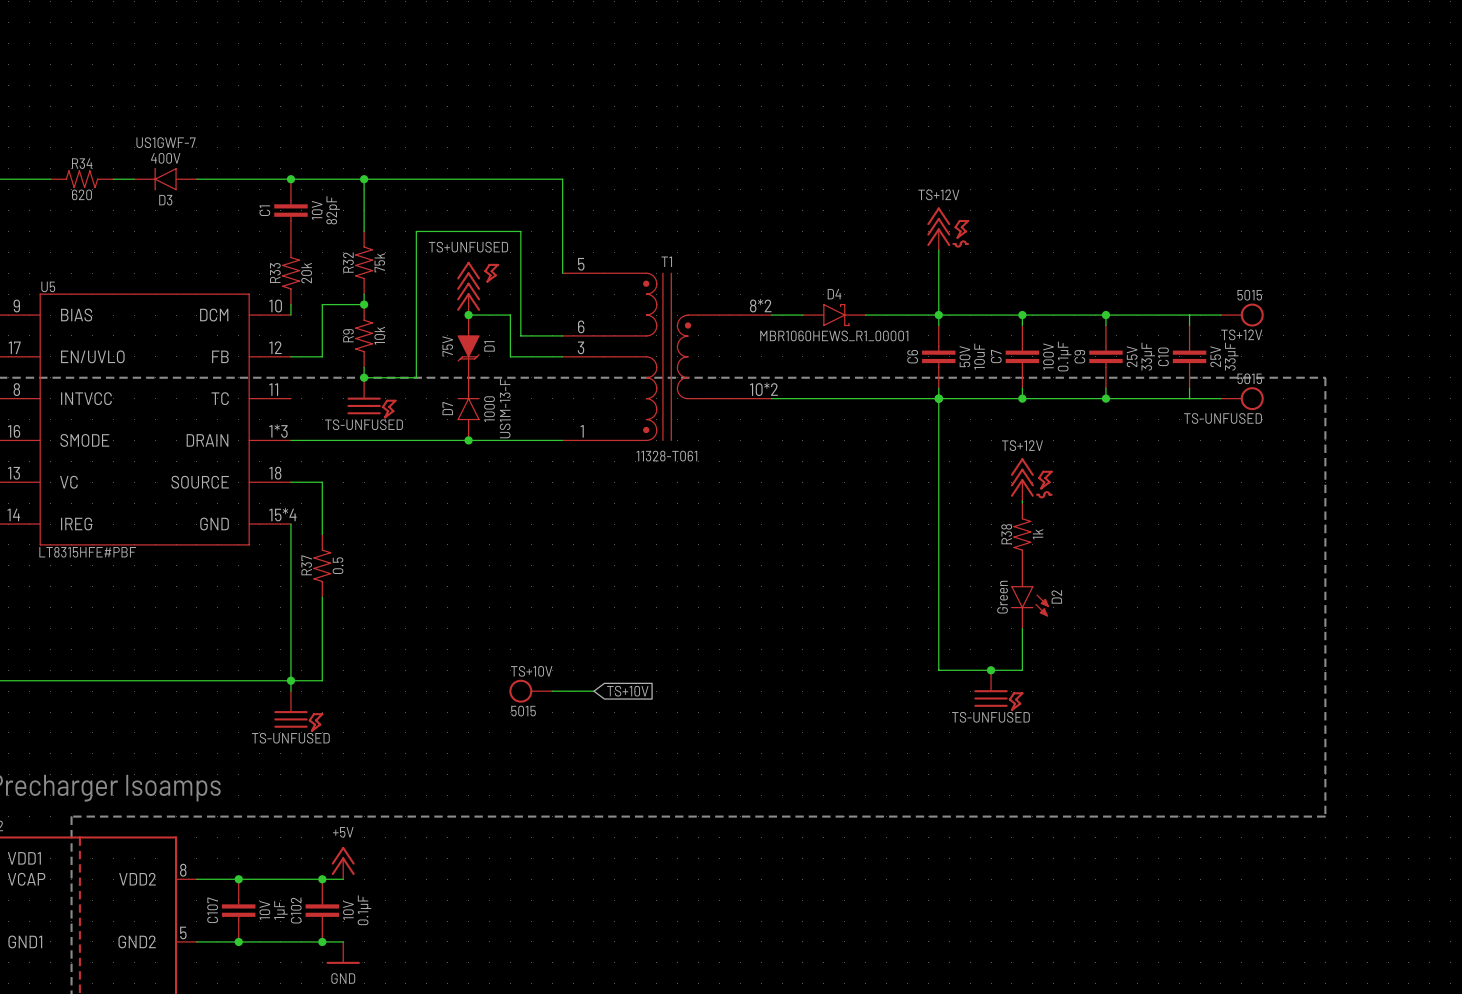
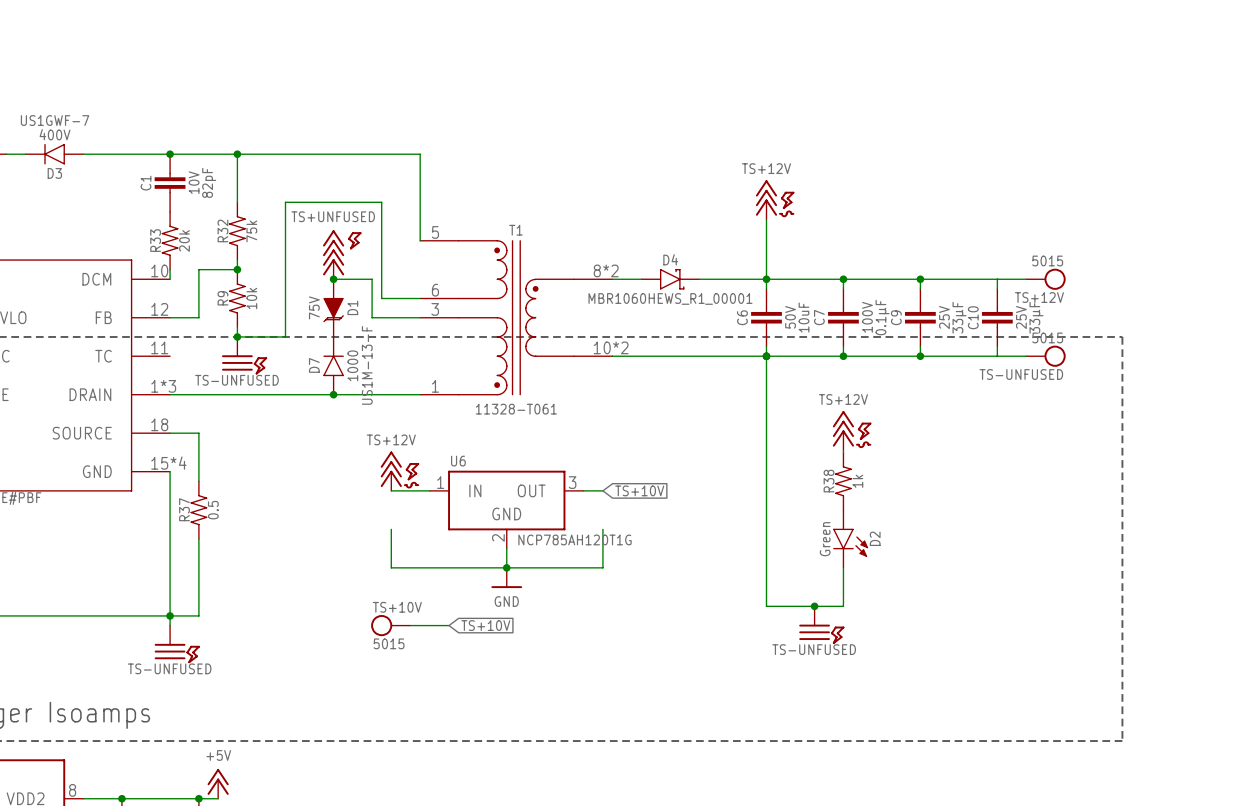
power symbol: none -> TS+12V (399, 471)
wire: none -> (391, 490) (429, 490)
wire: none -> (583, 490) (602, 490)
global label: none -> TS+10V (639, 490)
U6: none -> (506, 509)
wire: none -> (391, 529) (391, 567) (602, 567) (602, 529)
wire: none -> (506, 548) (506, 567)
junction: none -> (506, 567)
power symbol: none -> GND (506, 577)

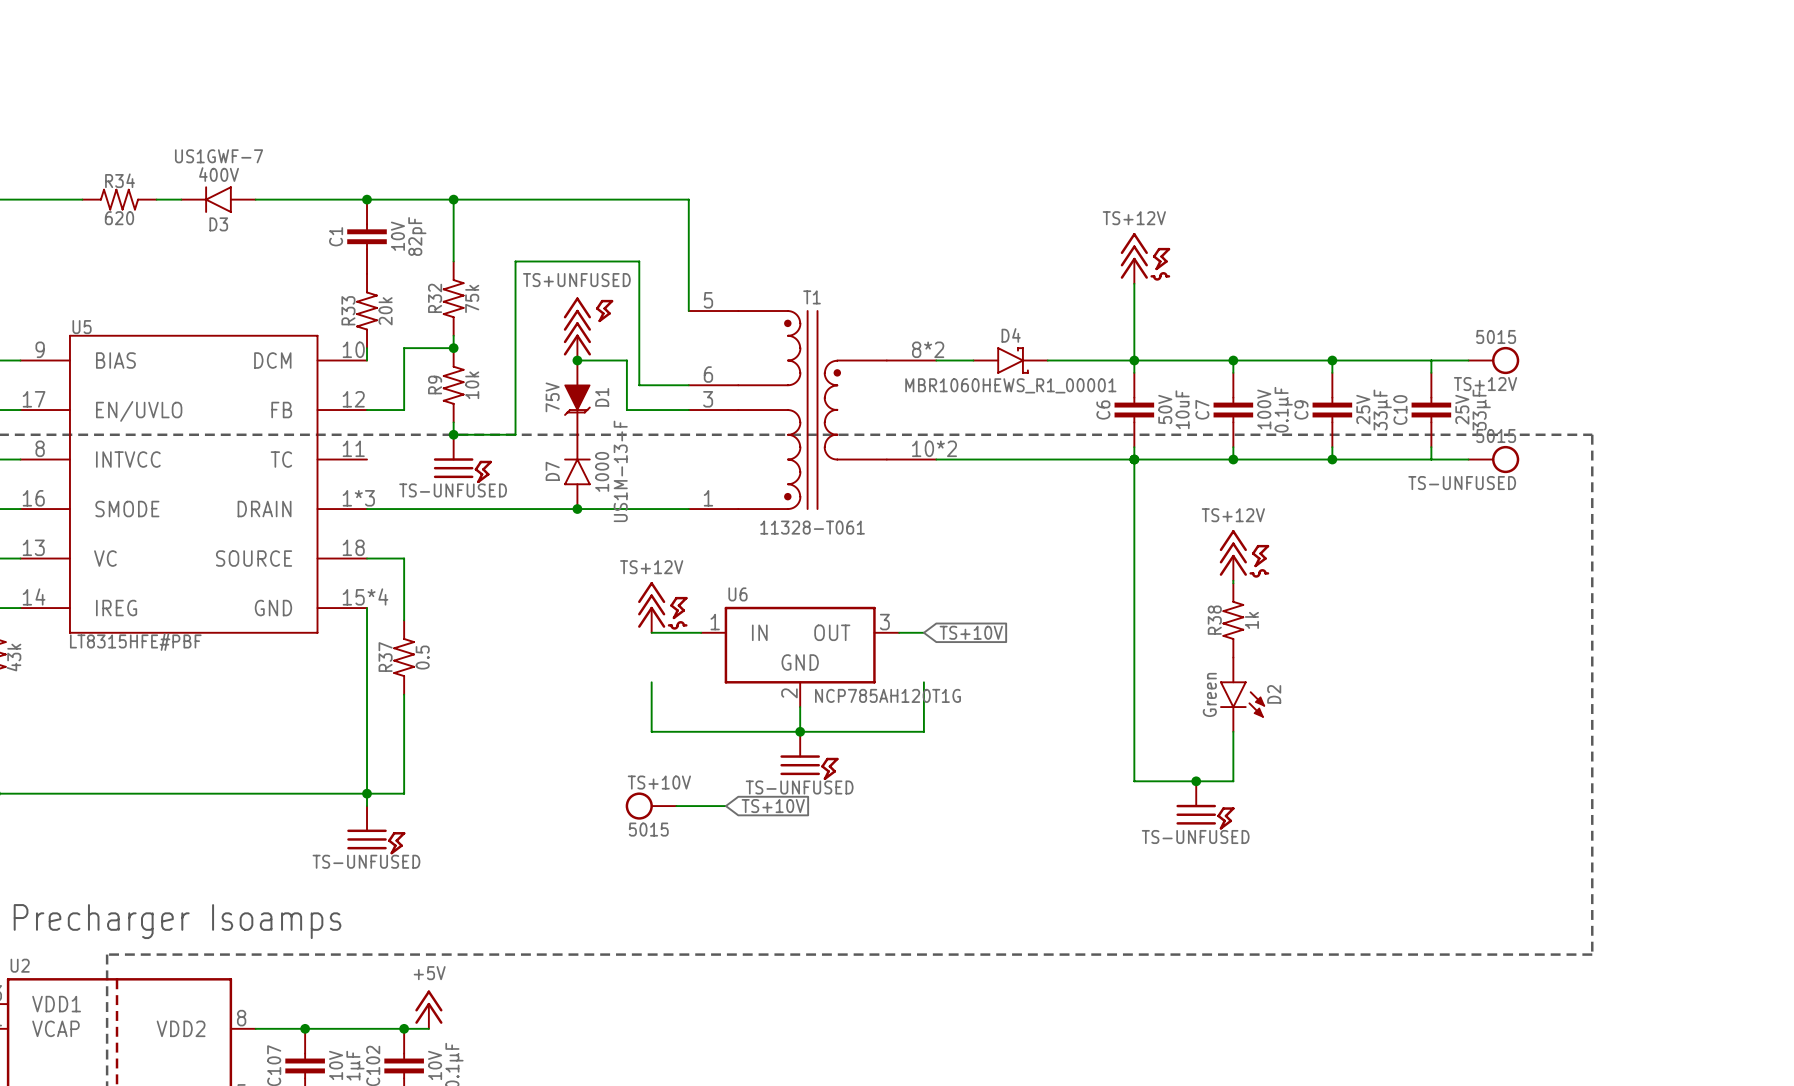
power symbol: GND (506, 577) -> none
power symbol: none -> TS-UNFUSED (809, 755)

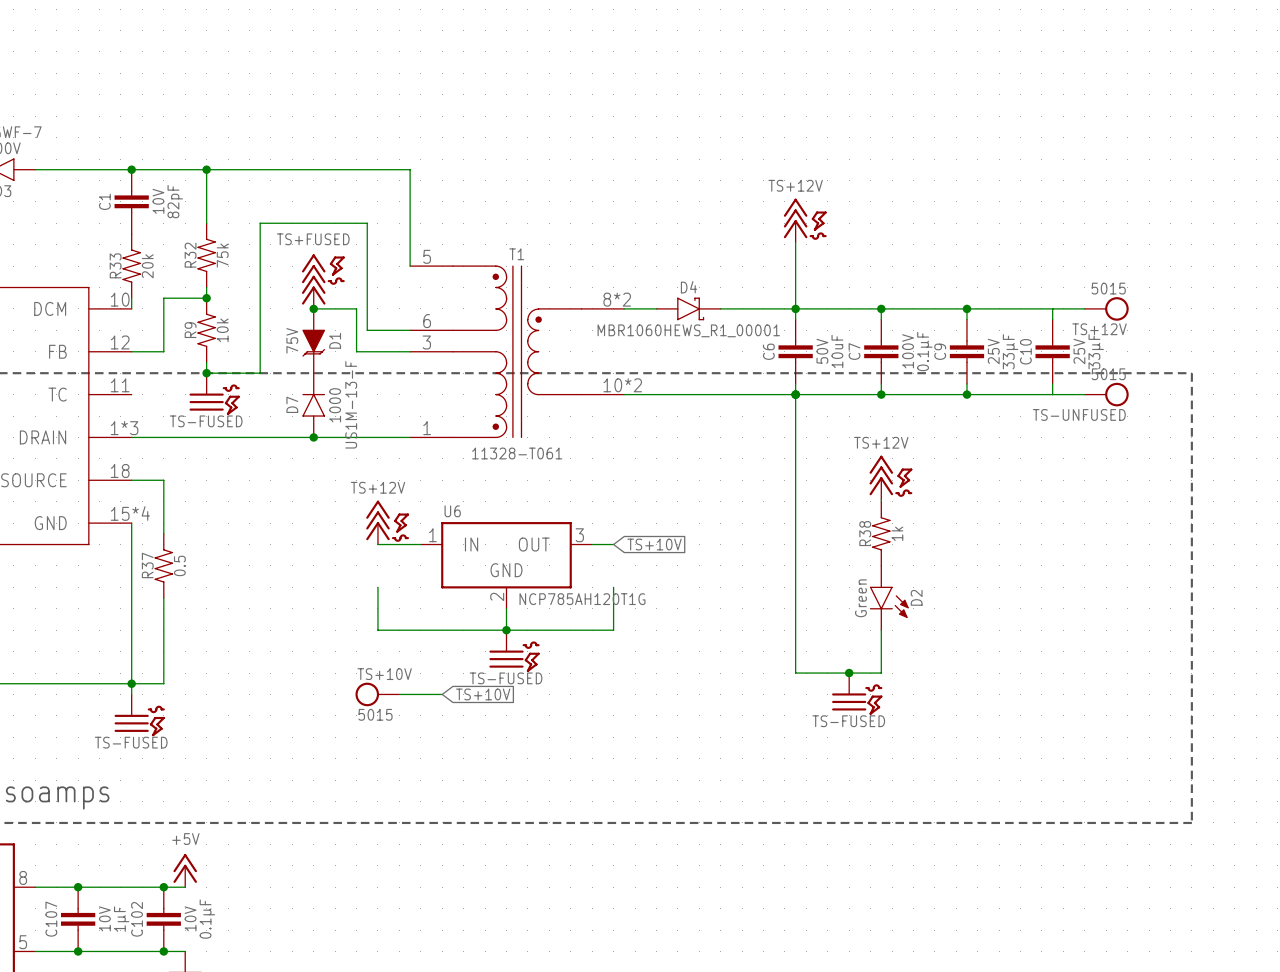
power symbol: TS+UNFUSED (588, 328) -> TS+FUSED (323, 281)
power symbol: TS-UNFUSED (462, 458) -> TS-FUSED (214, 394)
power symbol: TS-UNFUSED (809, 755) -> TS-FUSED (514, 651)
power symbol: TS-UNFUSED (1205, 805) -> TS-FUSED (857, 693)
power symbol: TS-UNFUSED (376, 830) -> TS-FUSED (139, 715)

